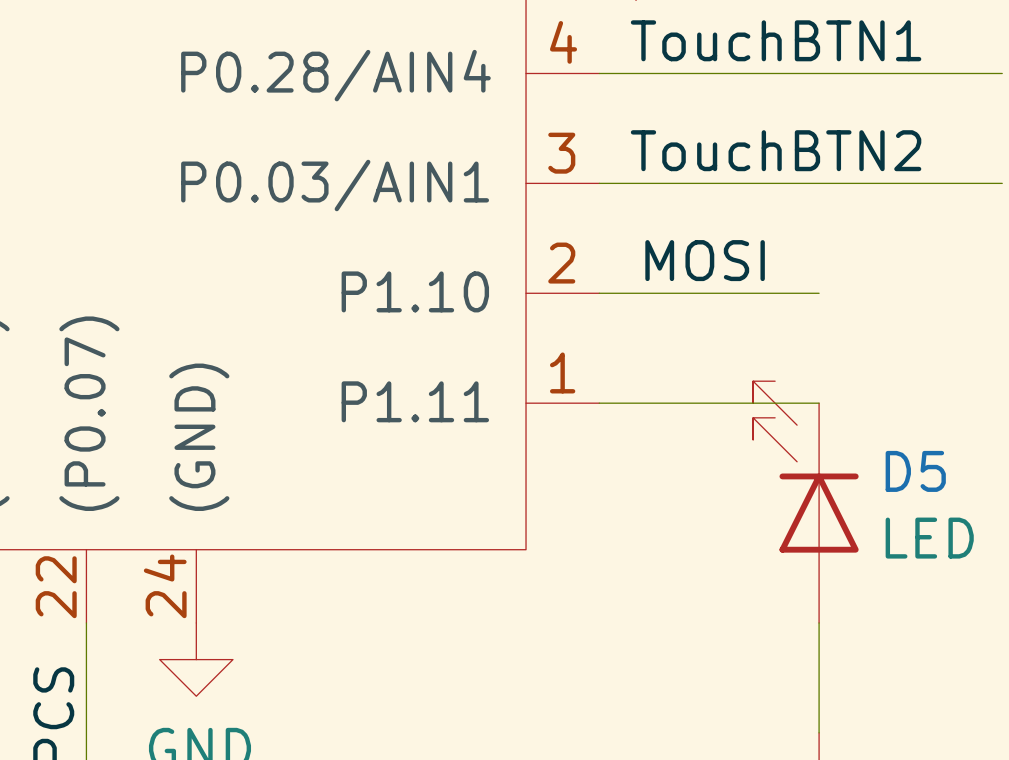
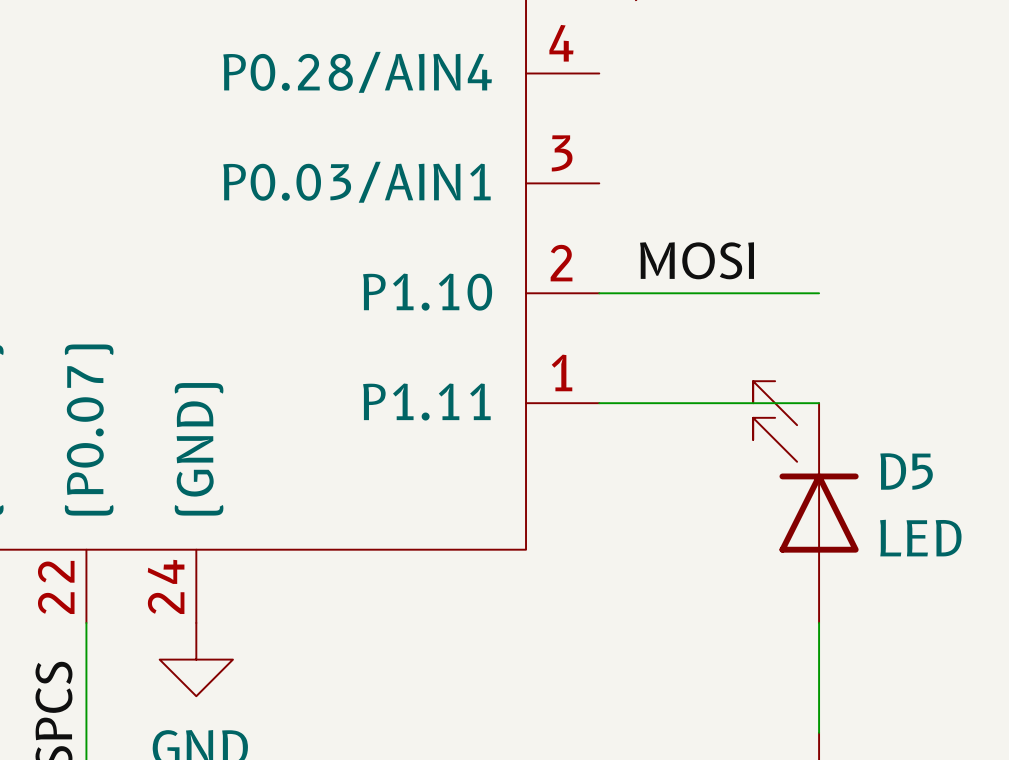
label: TouchBTN1 (776, 40) -> none
wire: (599, 73) (1002, 73) -> none
label: TouchBTN2 (776, 150) -> none
wire: (599, 183) (1002, 183) -> none

